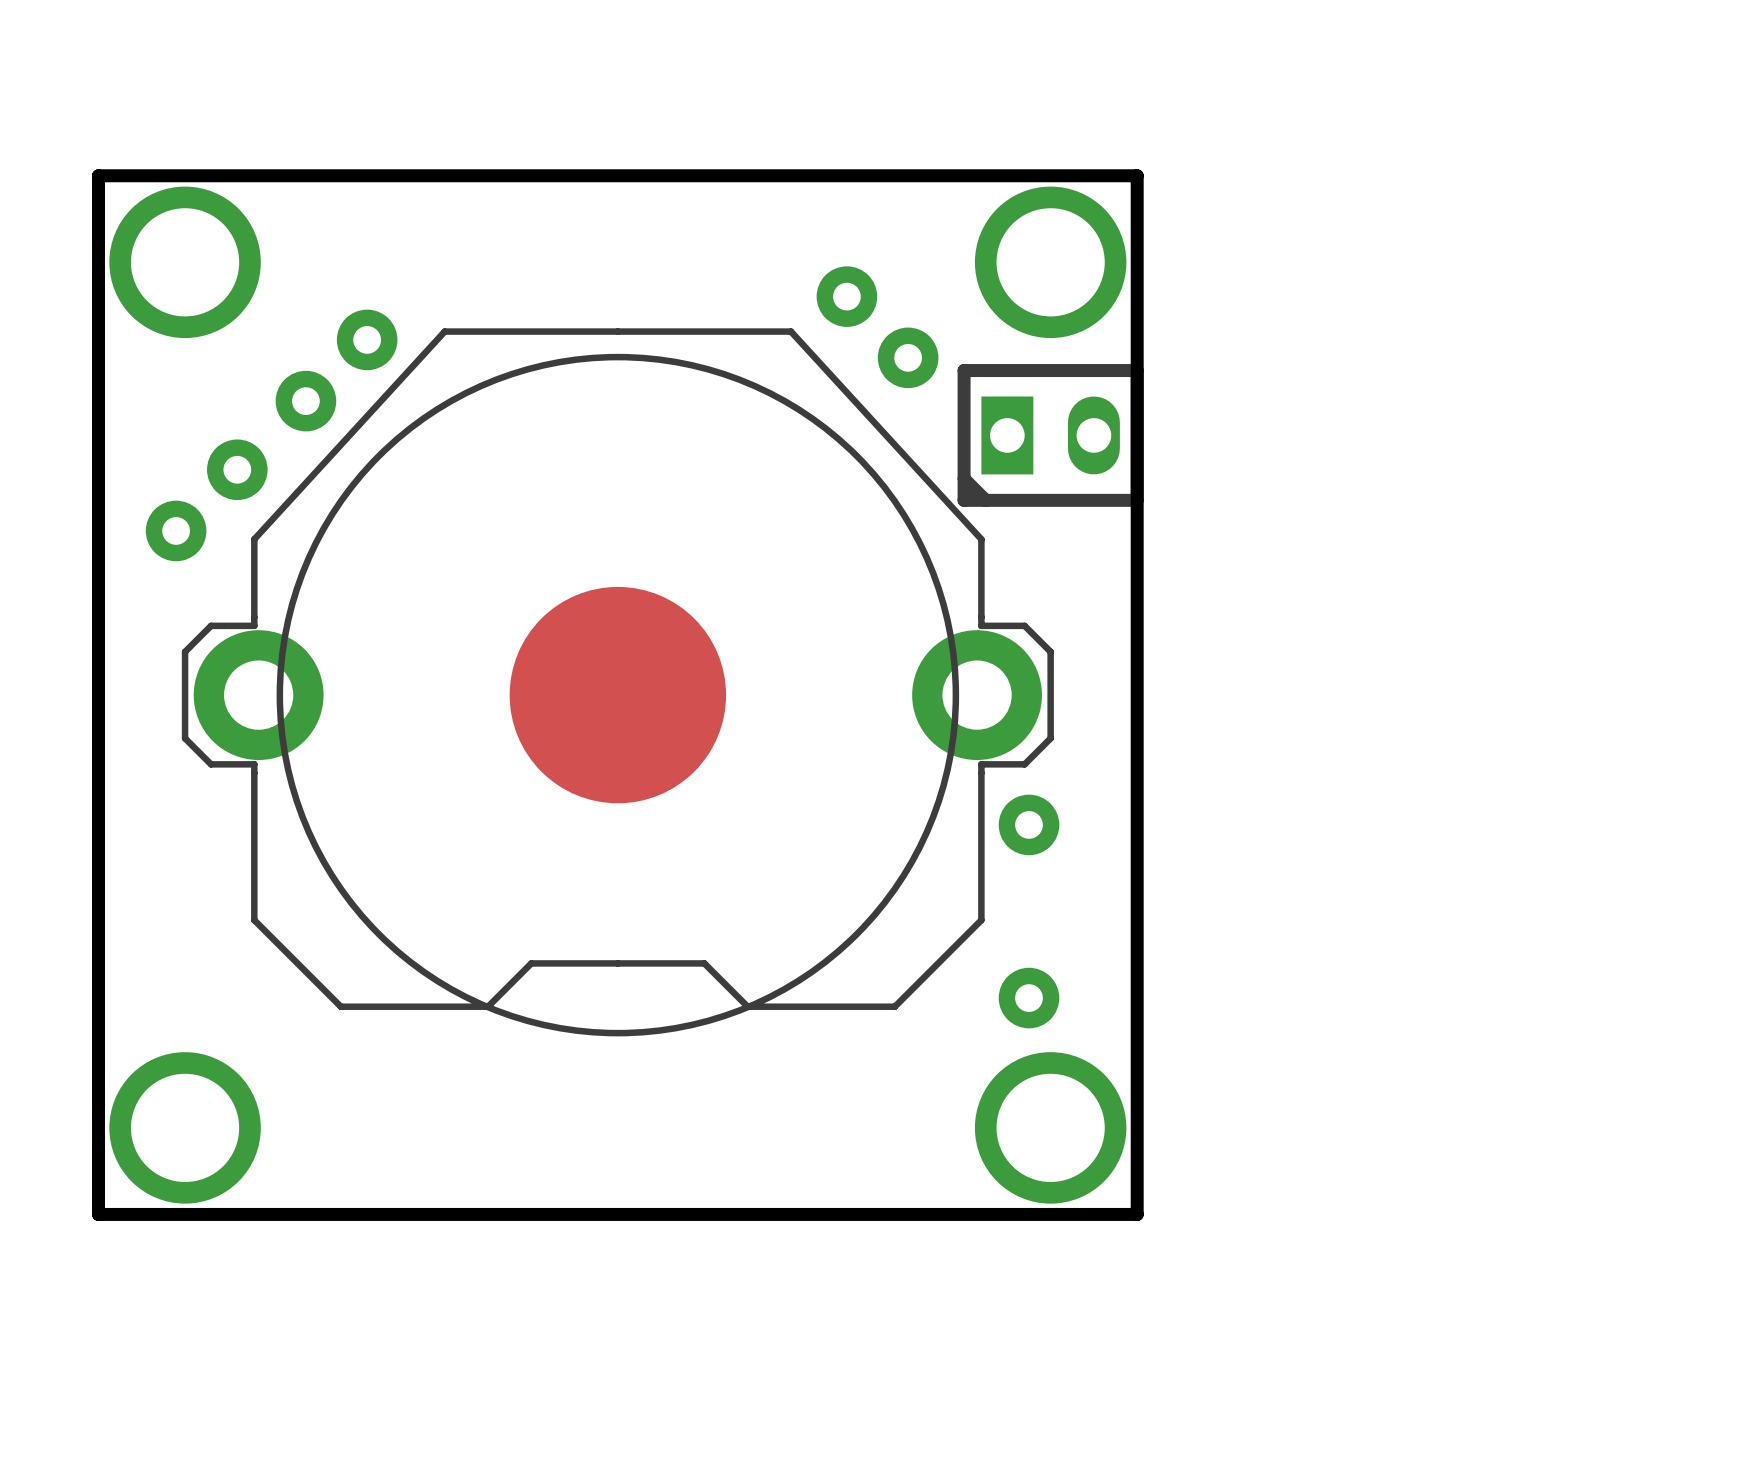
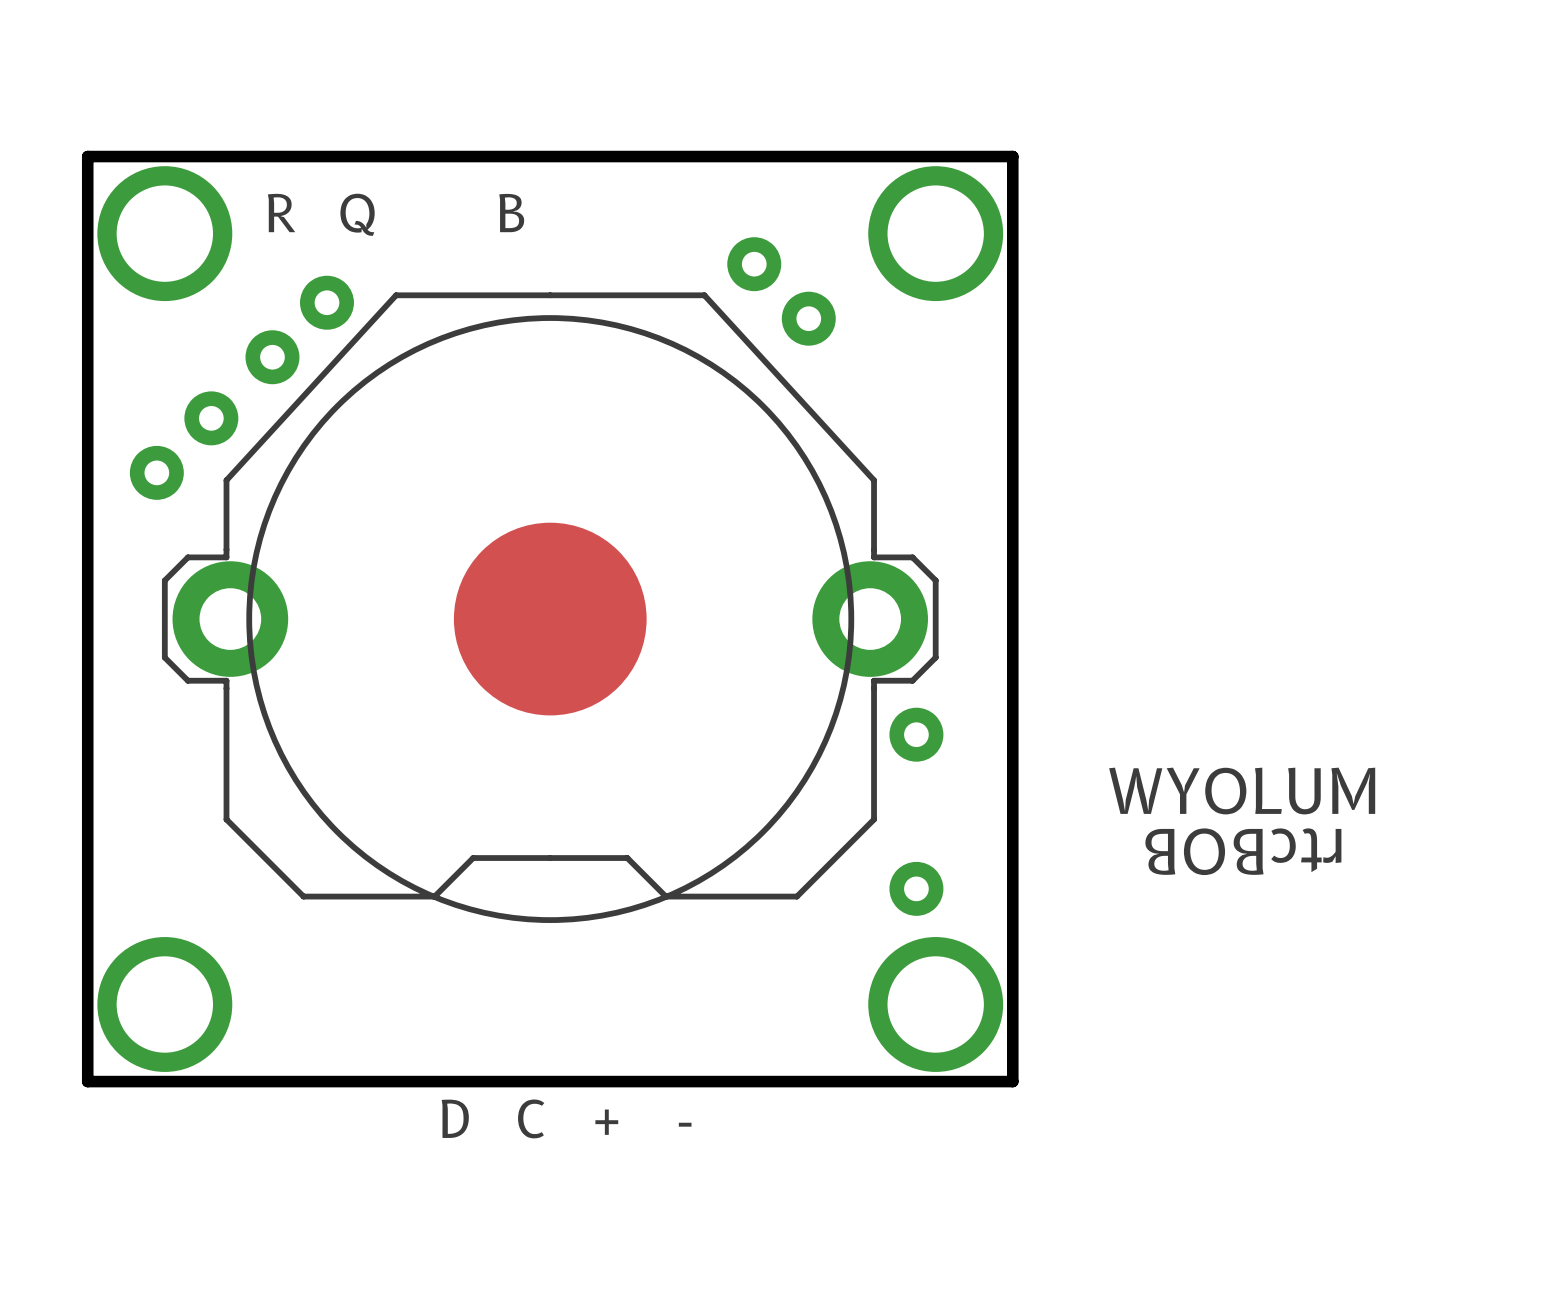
text: none -> R (281, 213)
text: none -> B (511, 213)
text: none -> Q (357, 214)
part: (1050, 435) -> none
text: none -> WYOLUM (1242, 791)
text: none -> rtcBOB (1243, 851)
text: none -> D (455, 1118)
text: none -> C (531, 1118)
text: none -> + (606, 1122)
text: none -> - (685, 1124)

